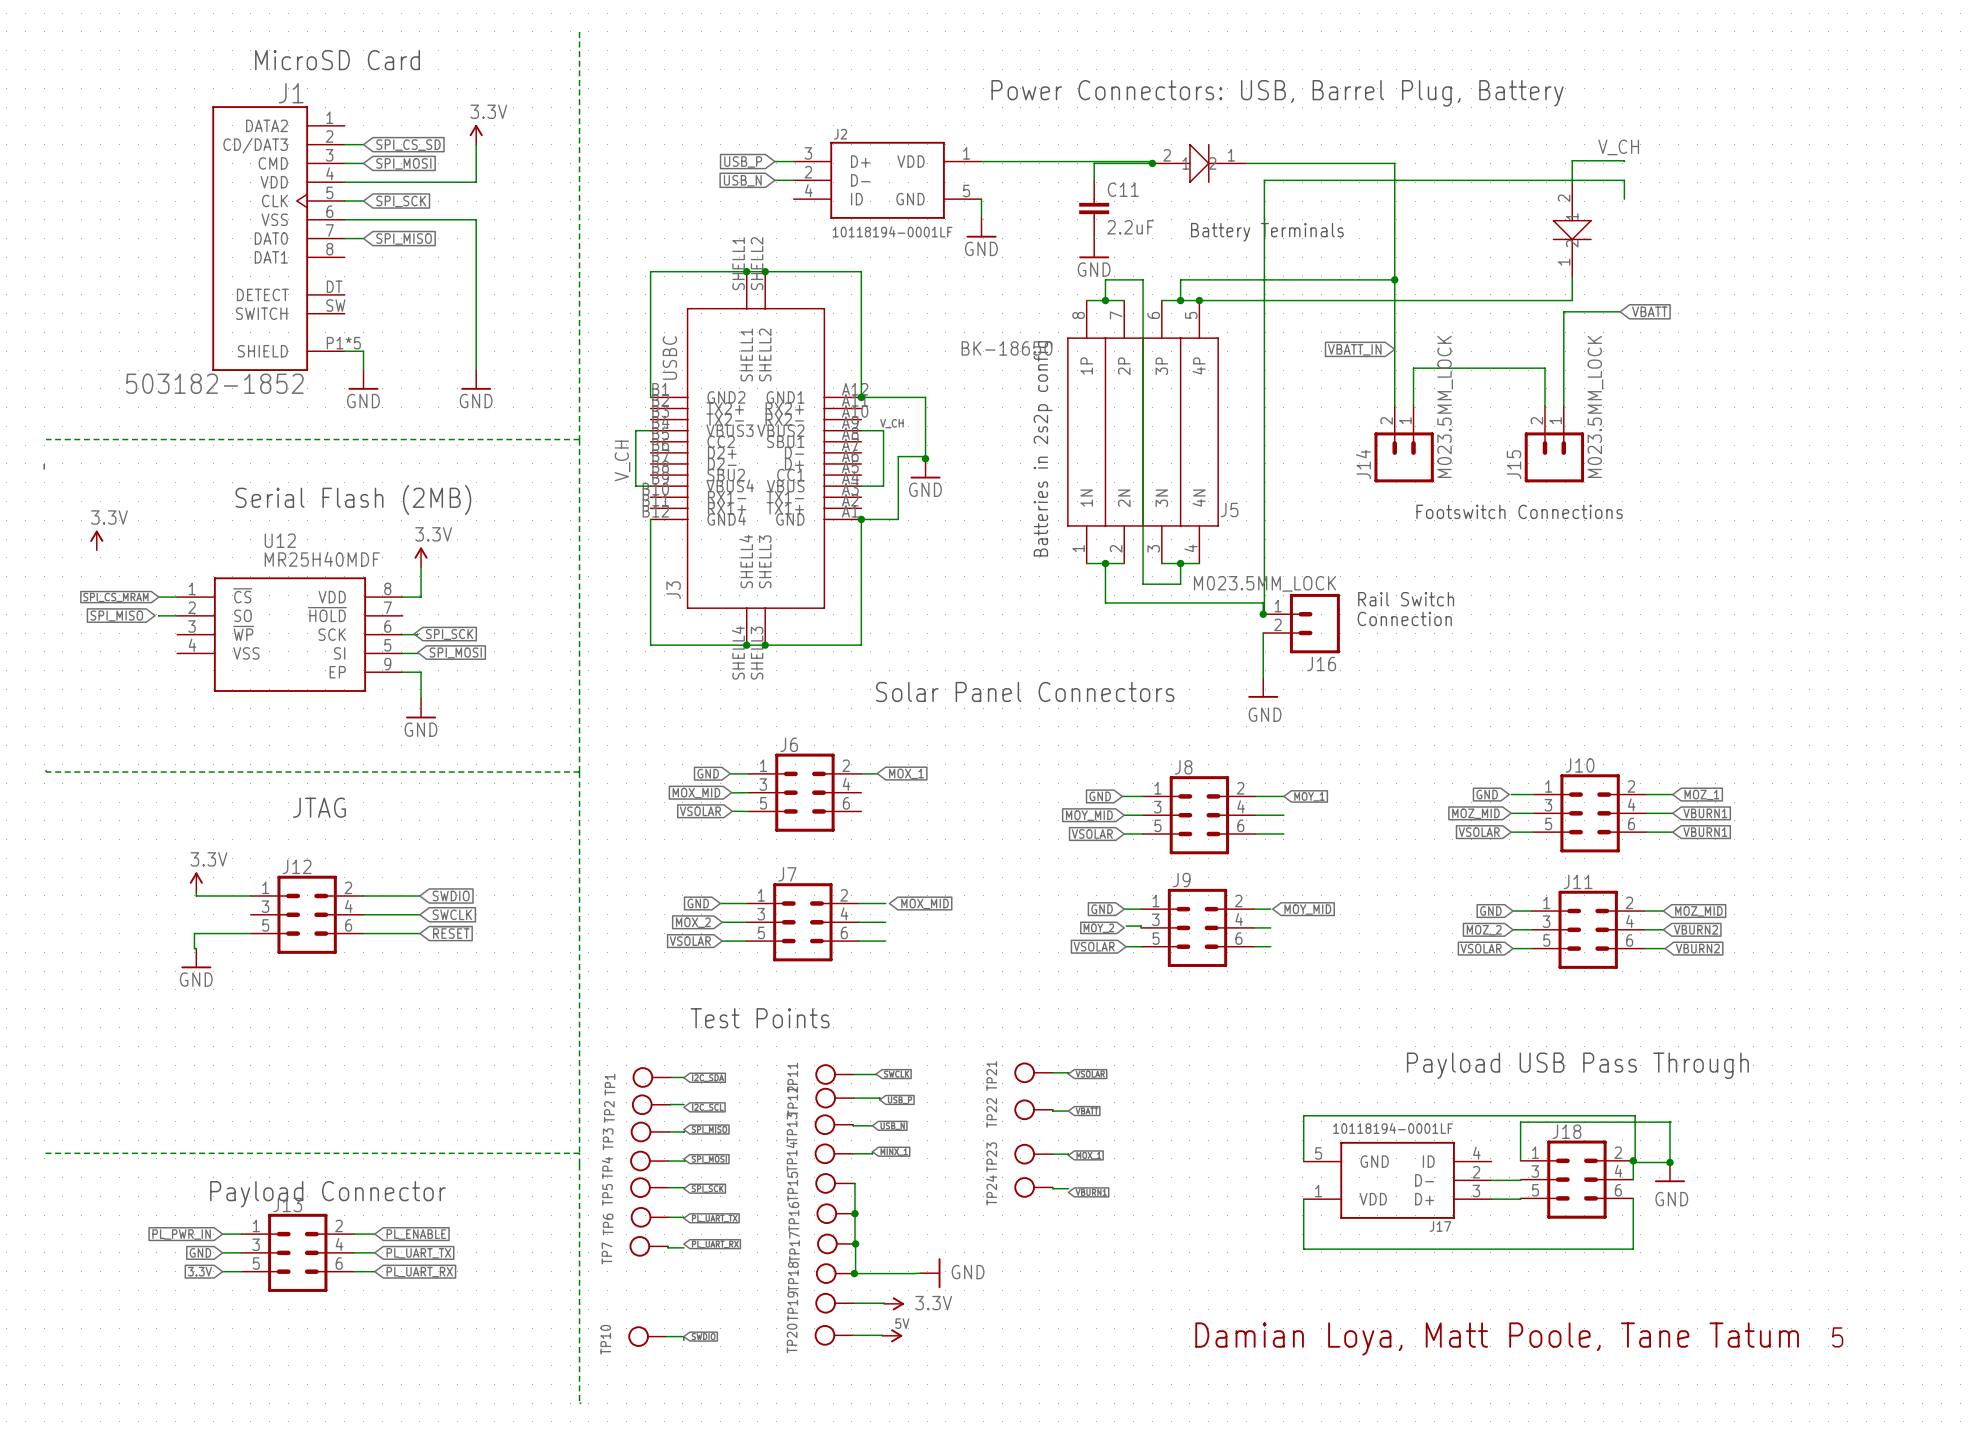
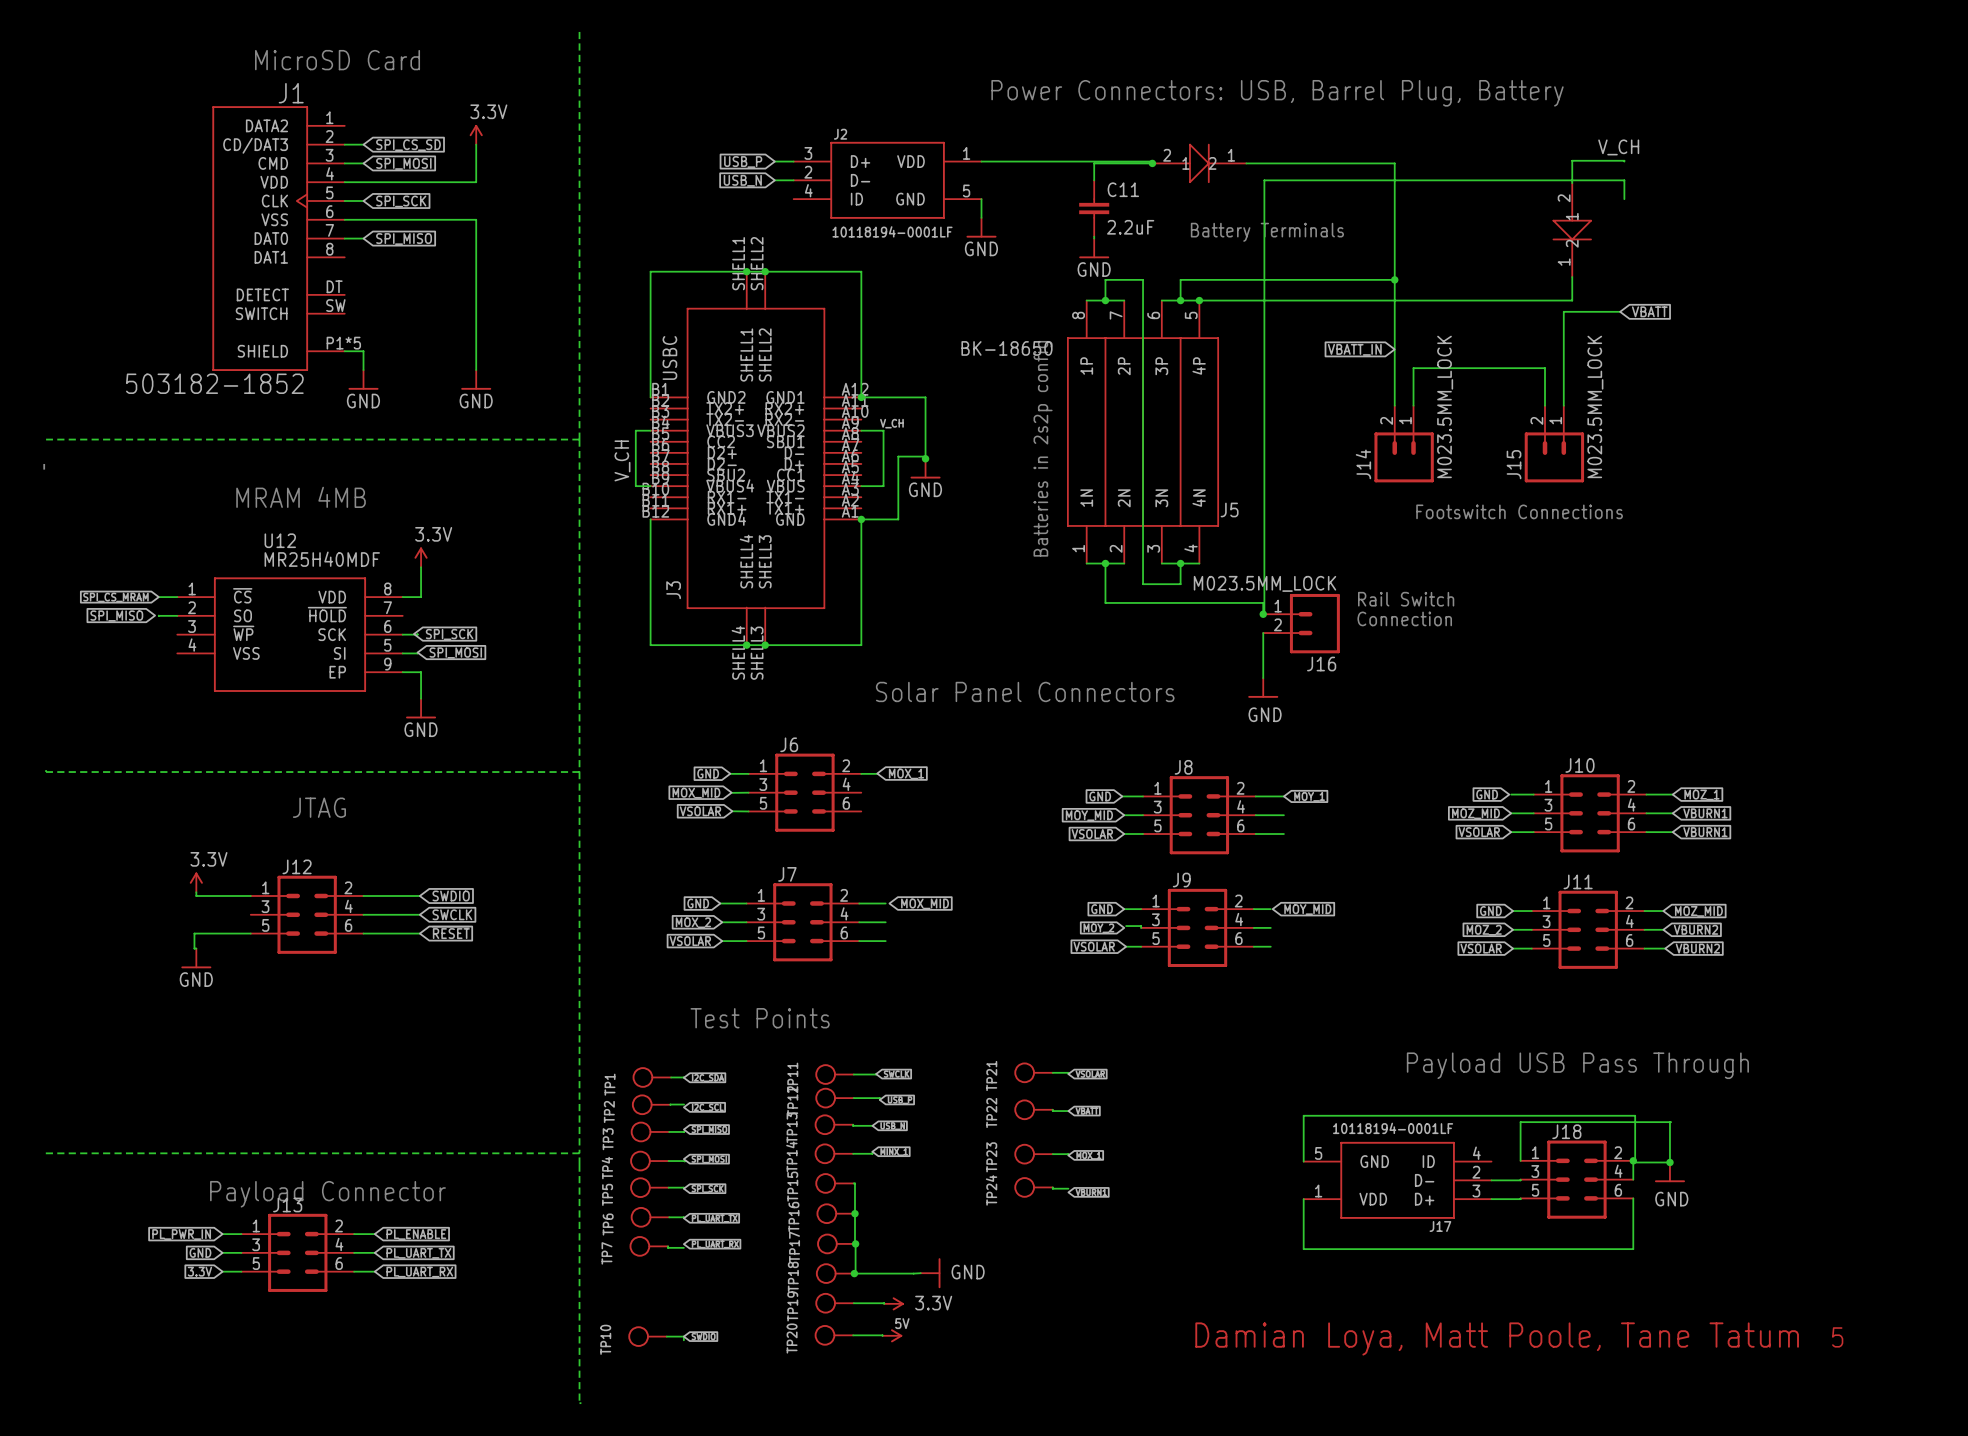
text: Serial Flash (2MB) (353, 500) -> MRAM 4MB (301, 497)
power symbol: 3.3V (96, 540) -> none

